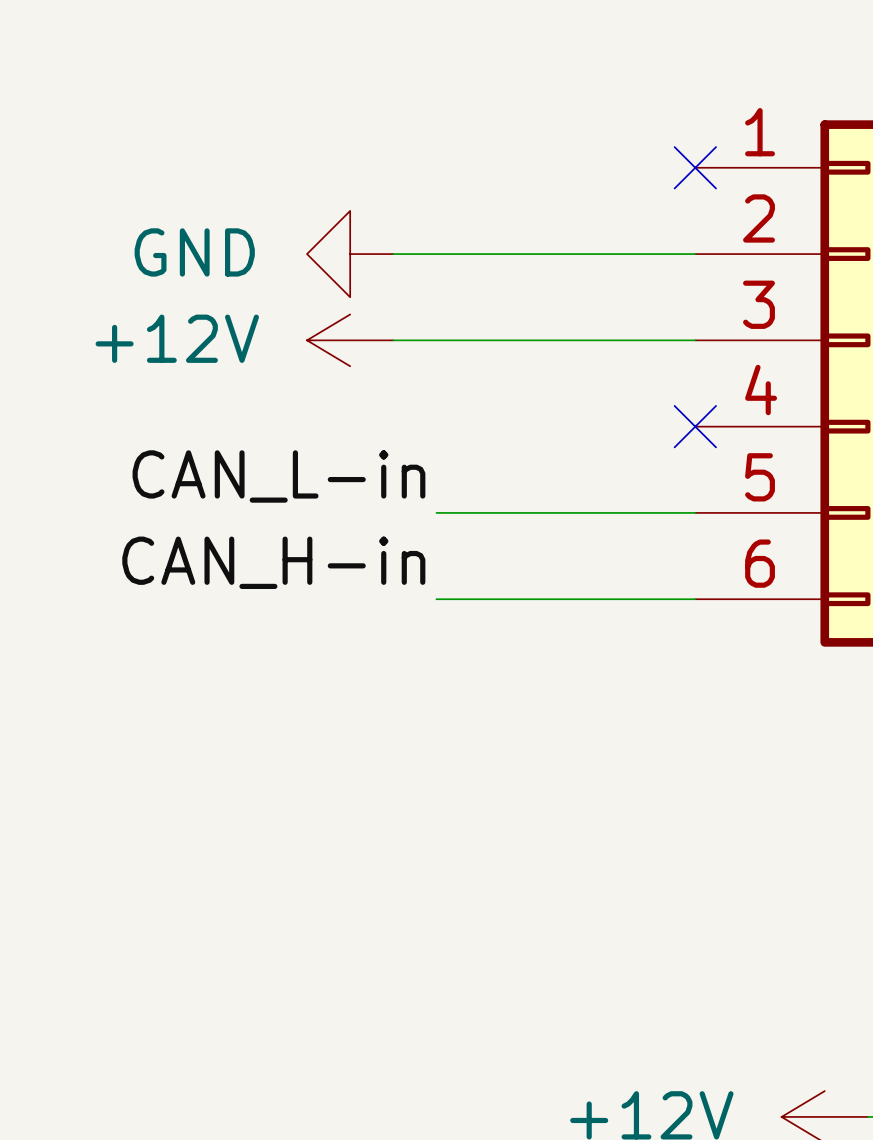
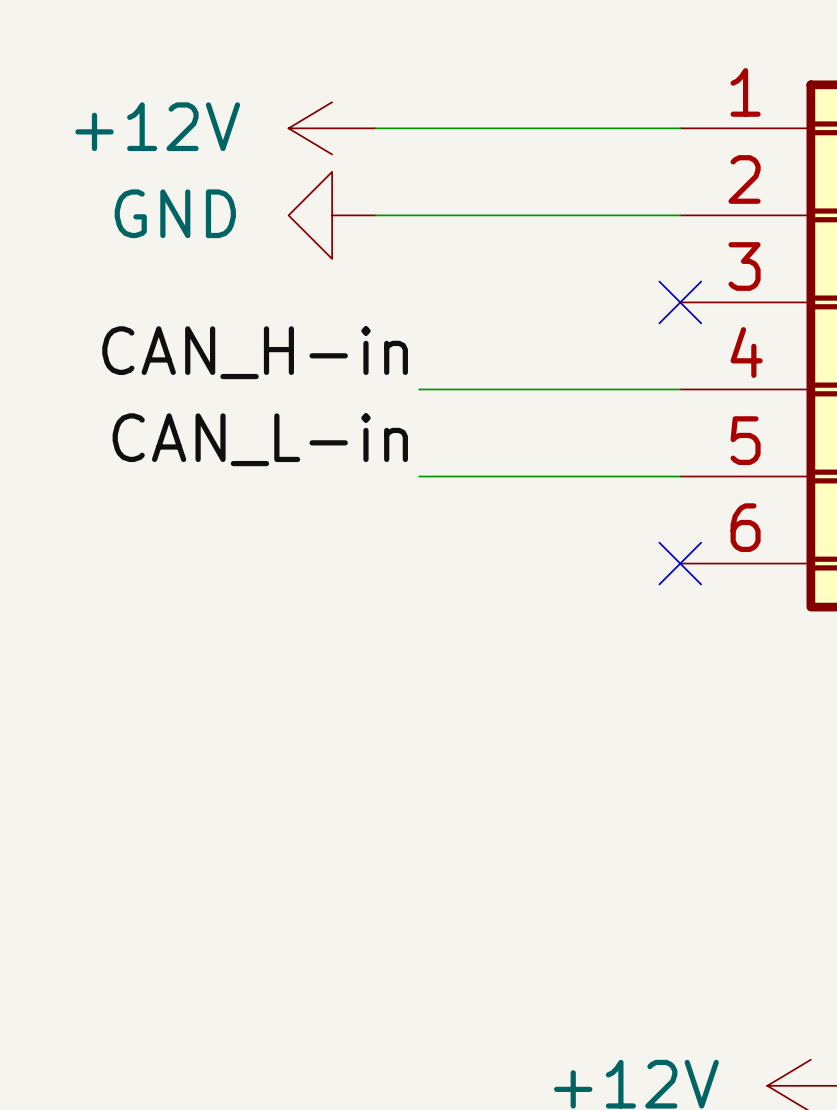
no-connect mark: (695, 167) -> none
power symbol position: +12V (350, 340) -> +12V (332, 128)
wire: (393, 340) (695, 340) -> (375, 128) (680, 128)
no-connect mark: none -> (680, 302)
no-connect mark: (695, 426) -> none
label position: CAN_H-in (273, 562) -> CAN_H-in (255, 352)
wire: (436, 599) (695, 599) -> (419, 389) (680, 389)
no-connect mark: none -> (680, 563)

